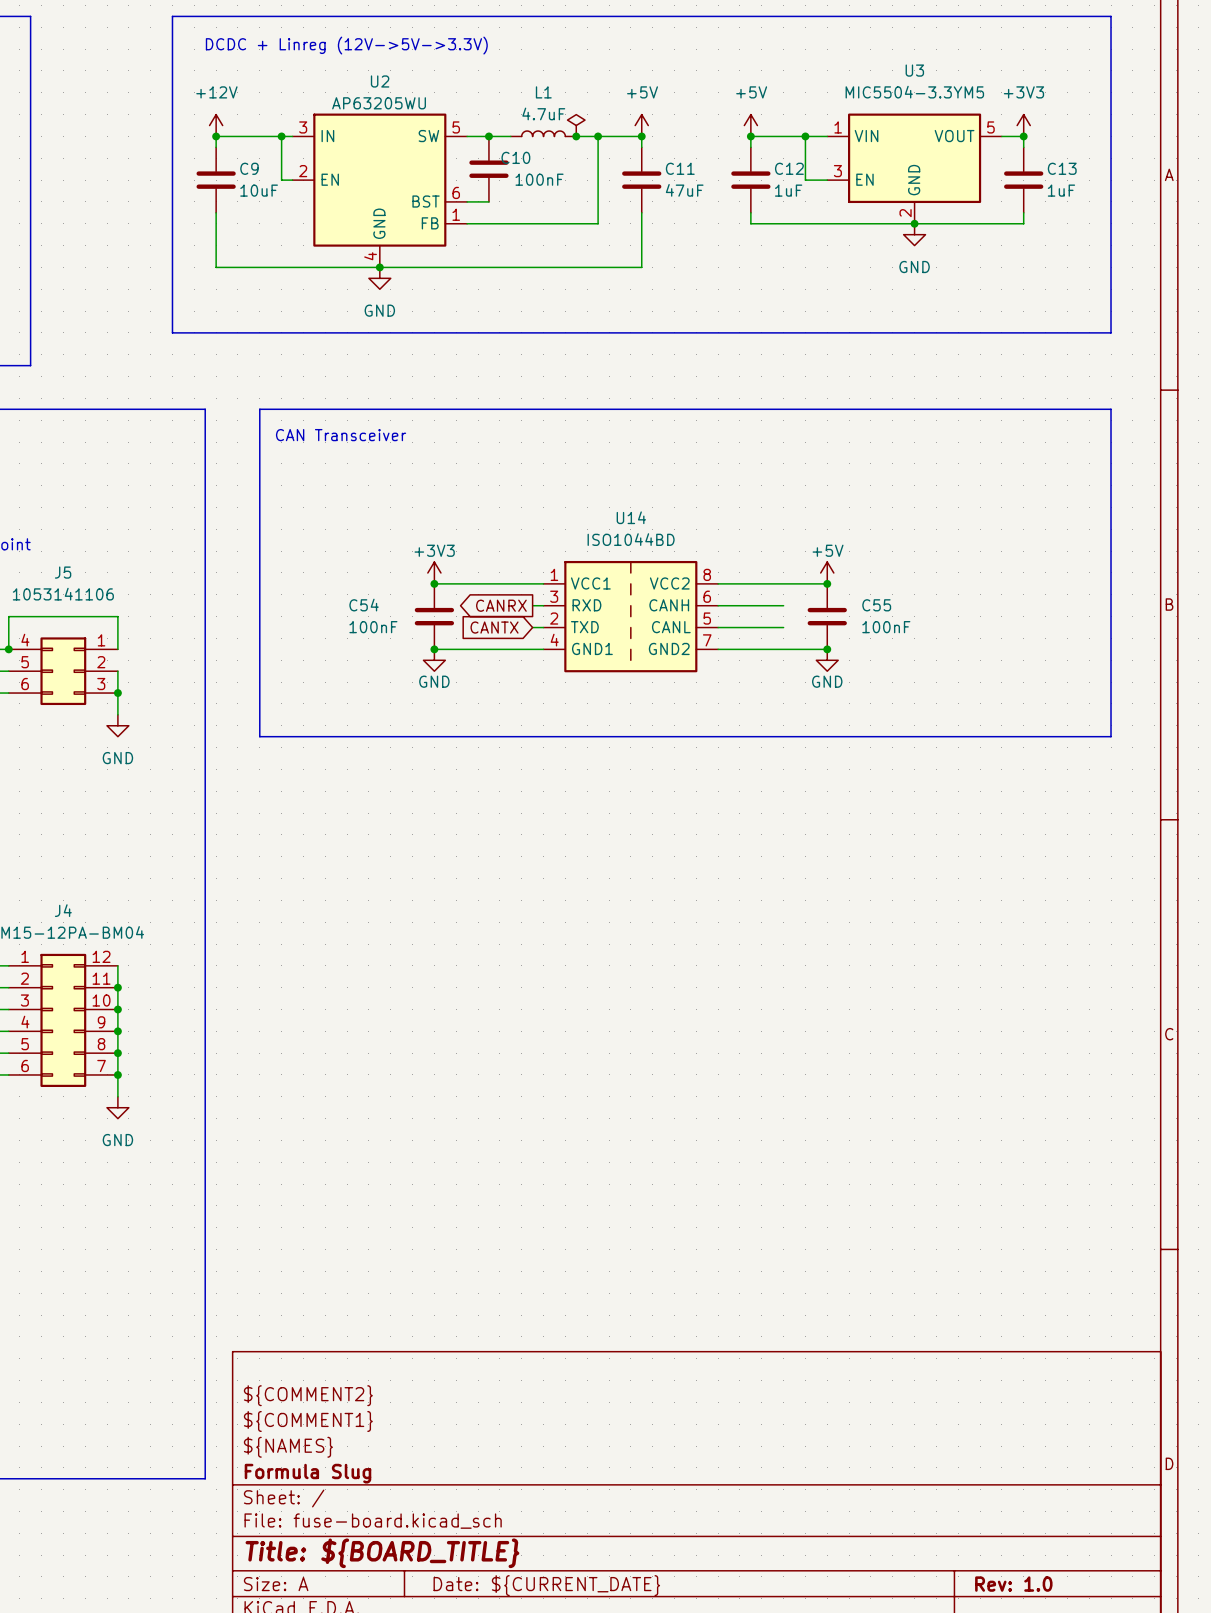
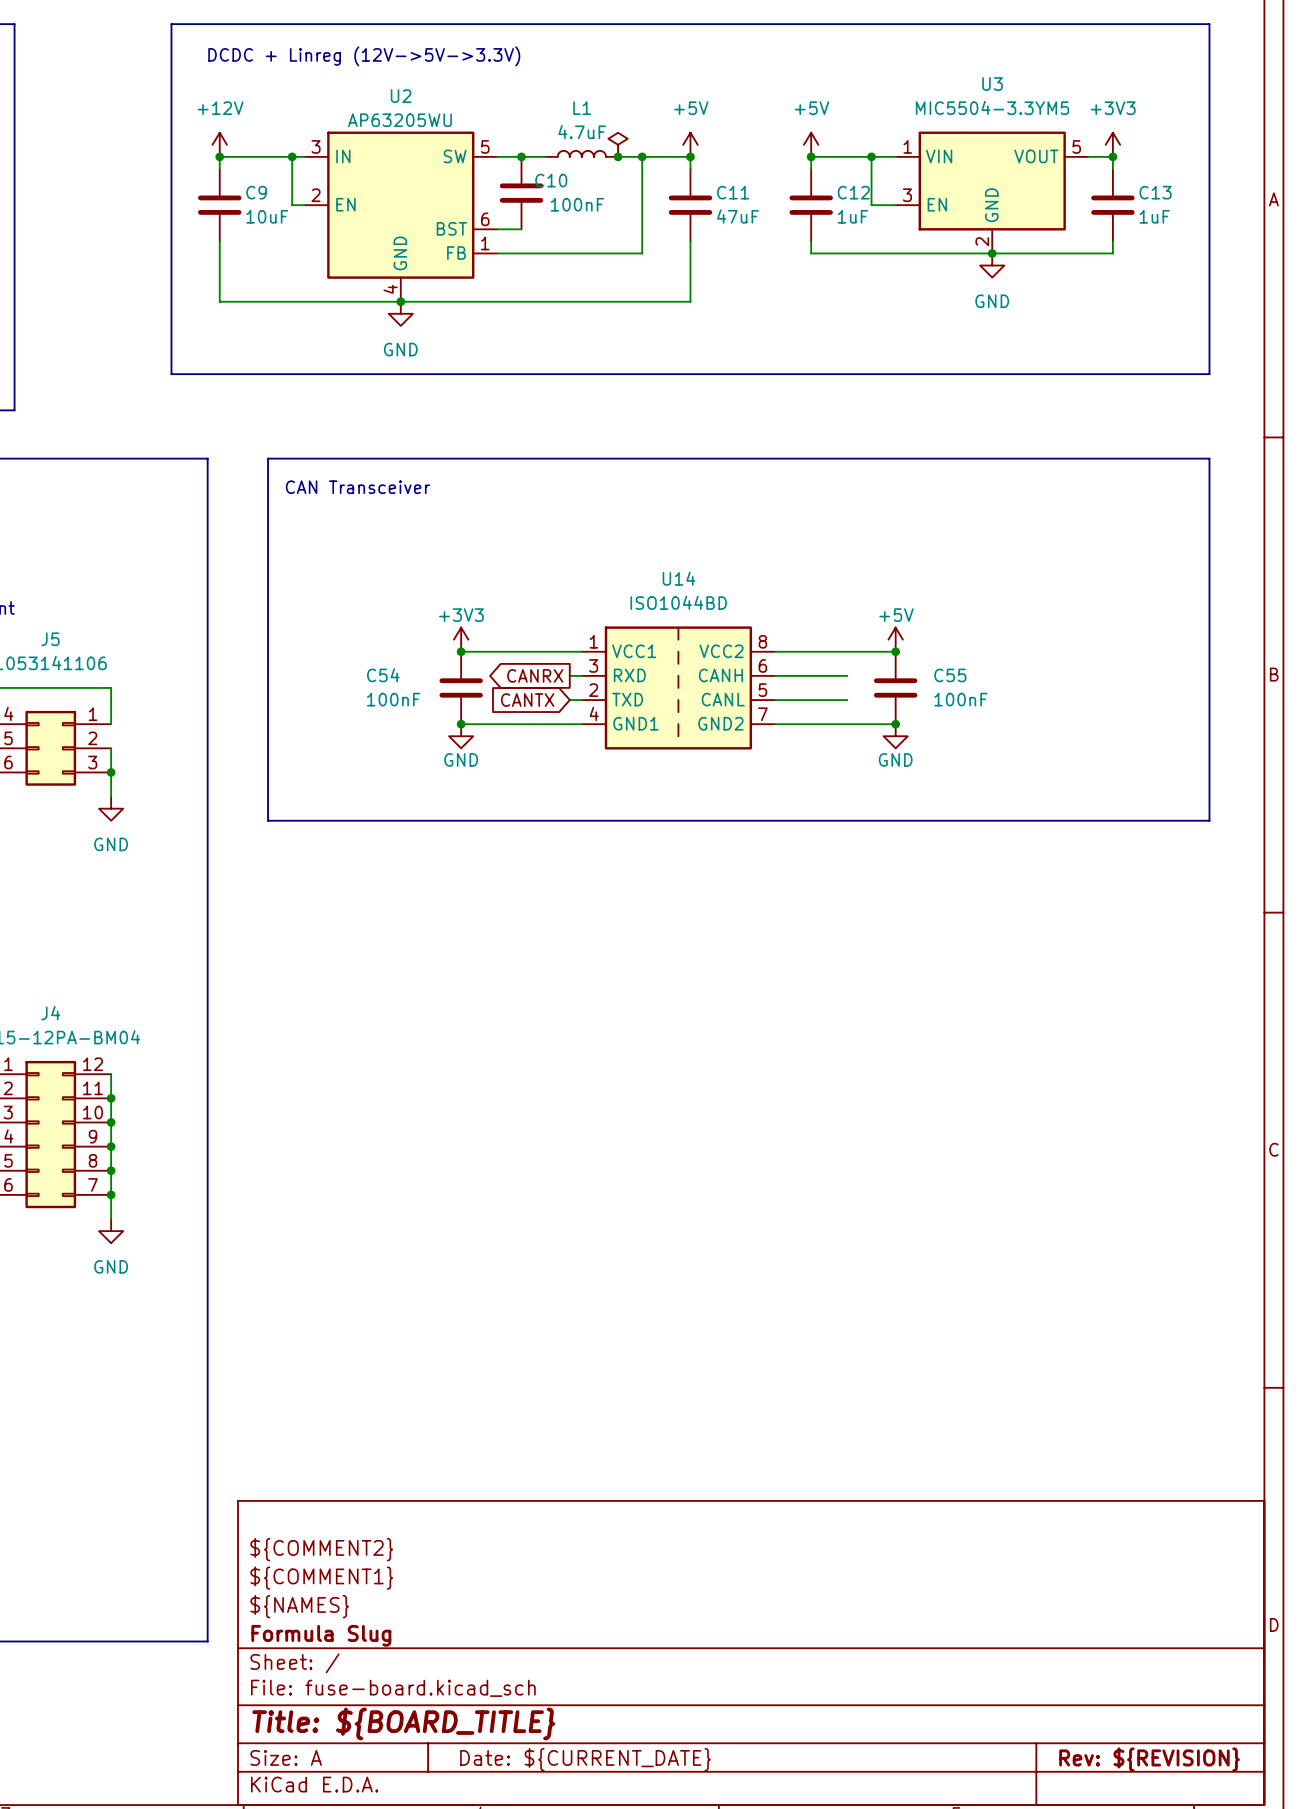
title block: Rev: 1.0 (1013, 1584) -> Rev: ${REVISION} (1149, 1759)

